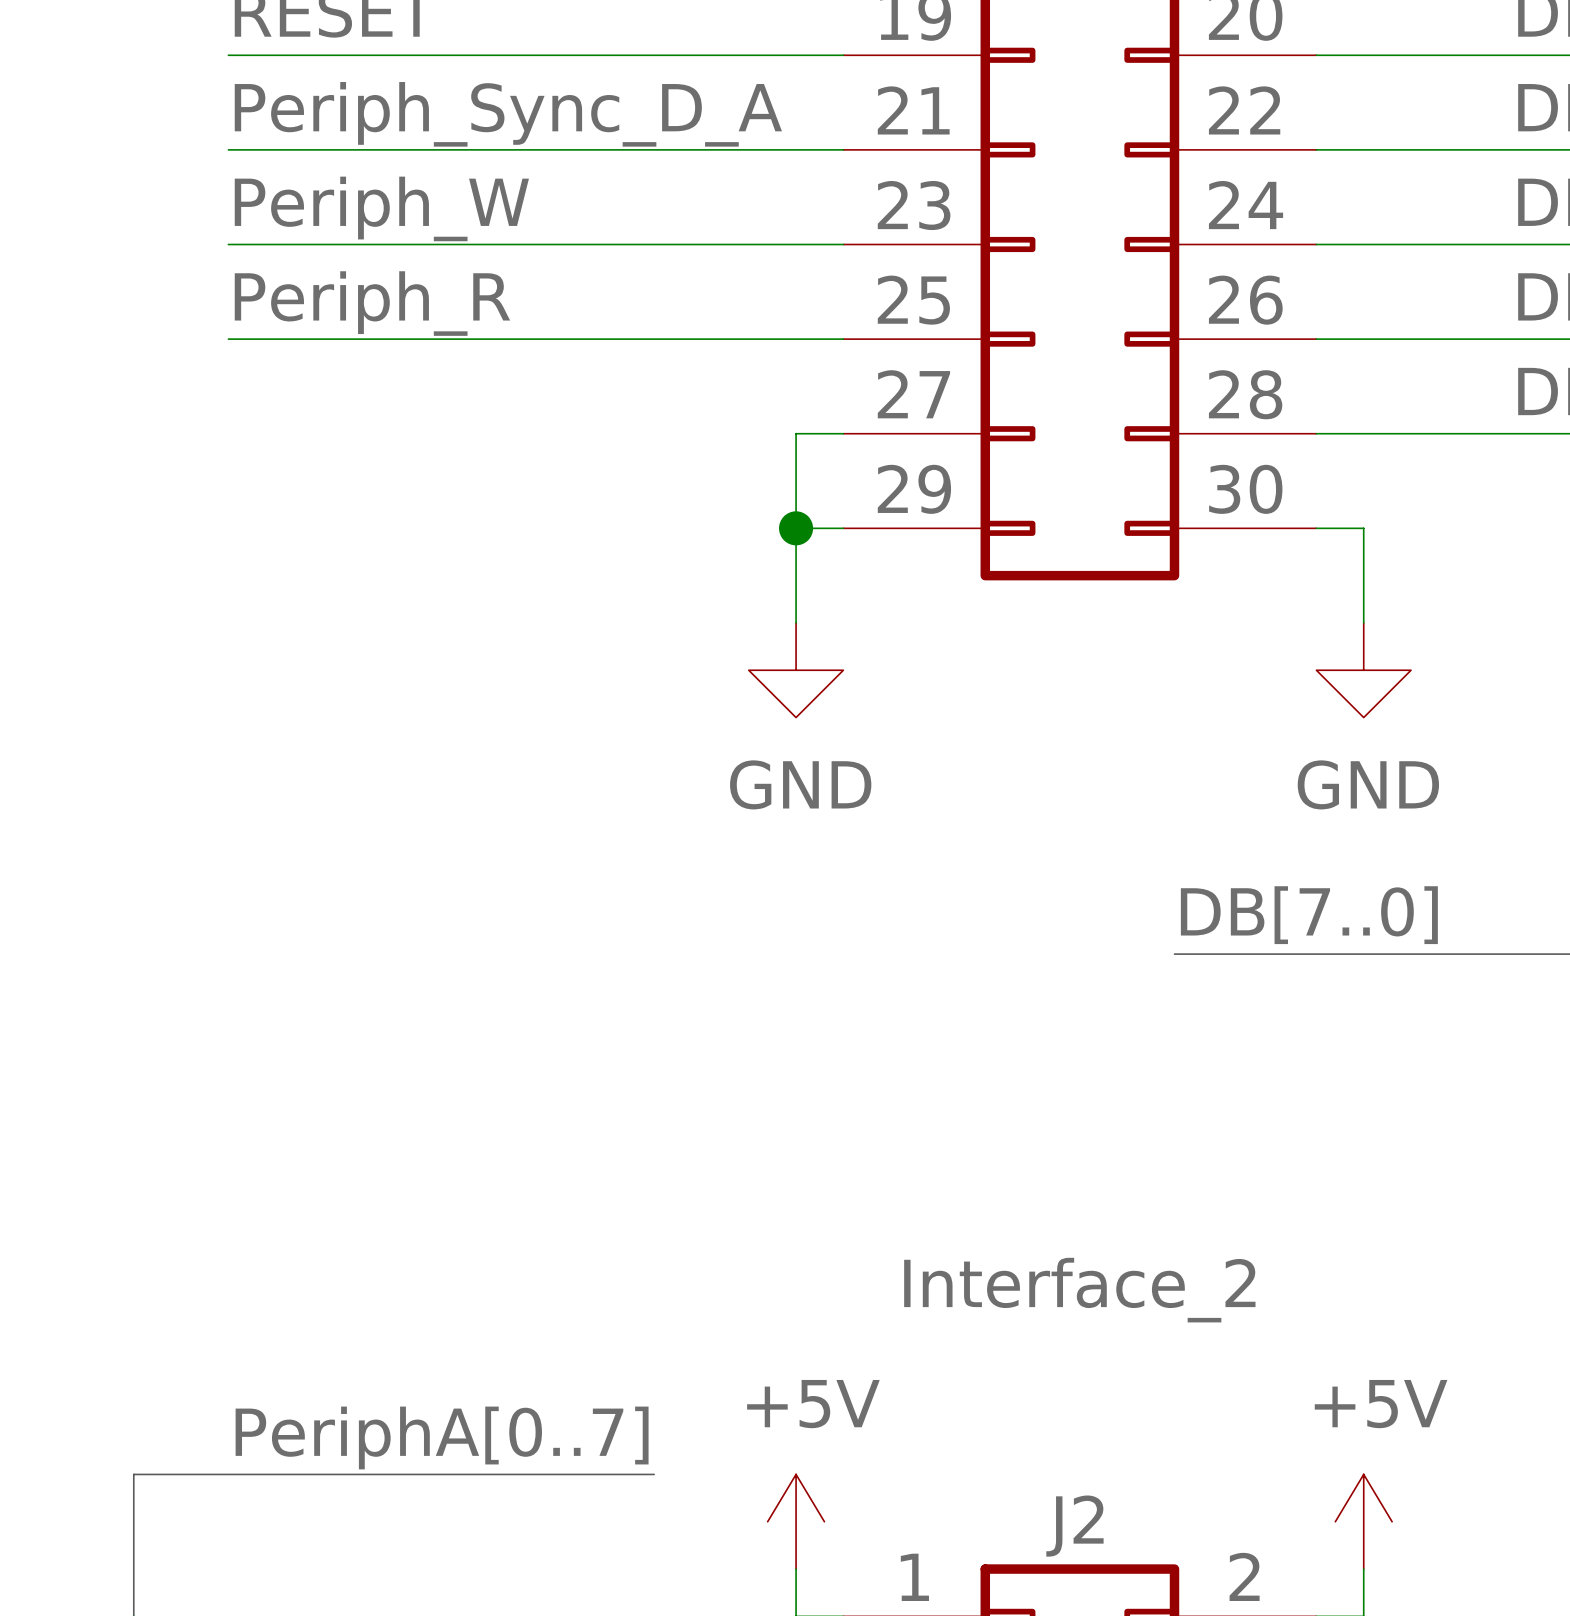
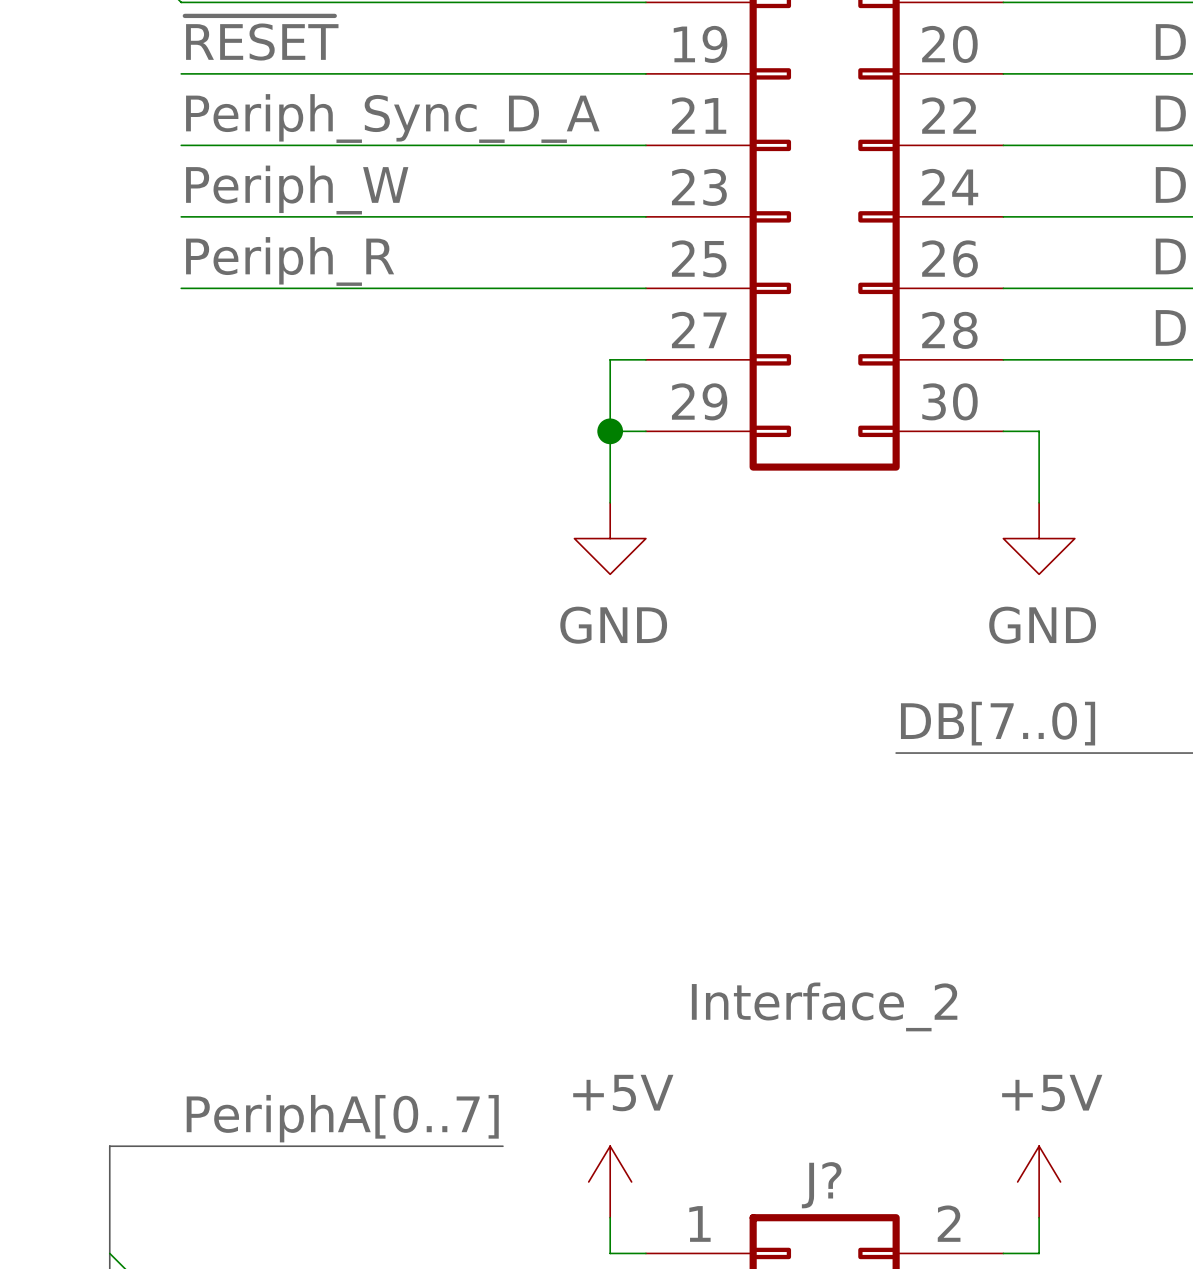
J2 name: J2 (1074, 1526) -> J? (821, 1185)

